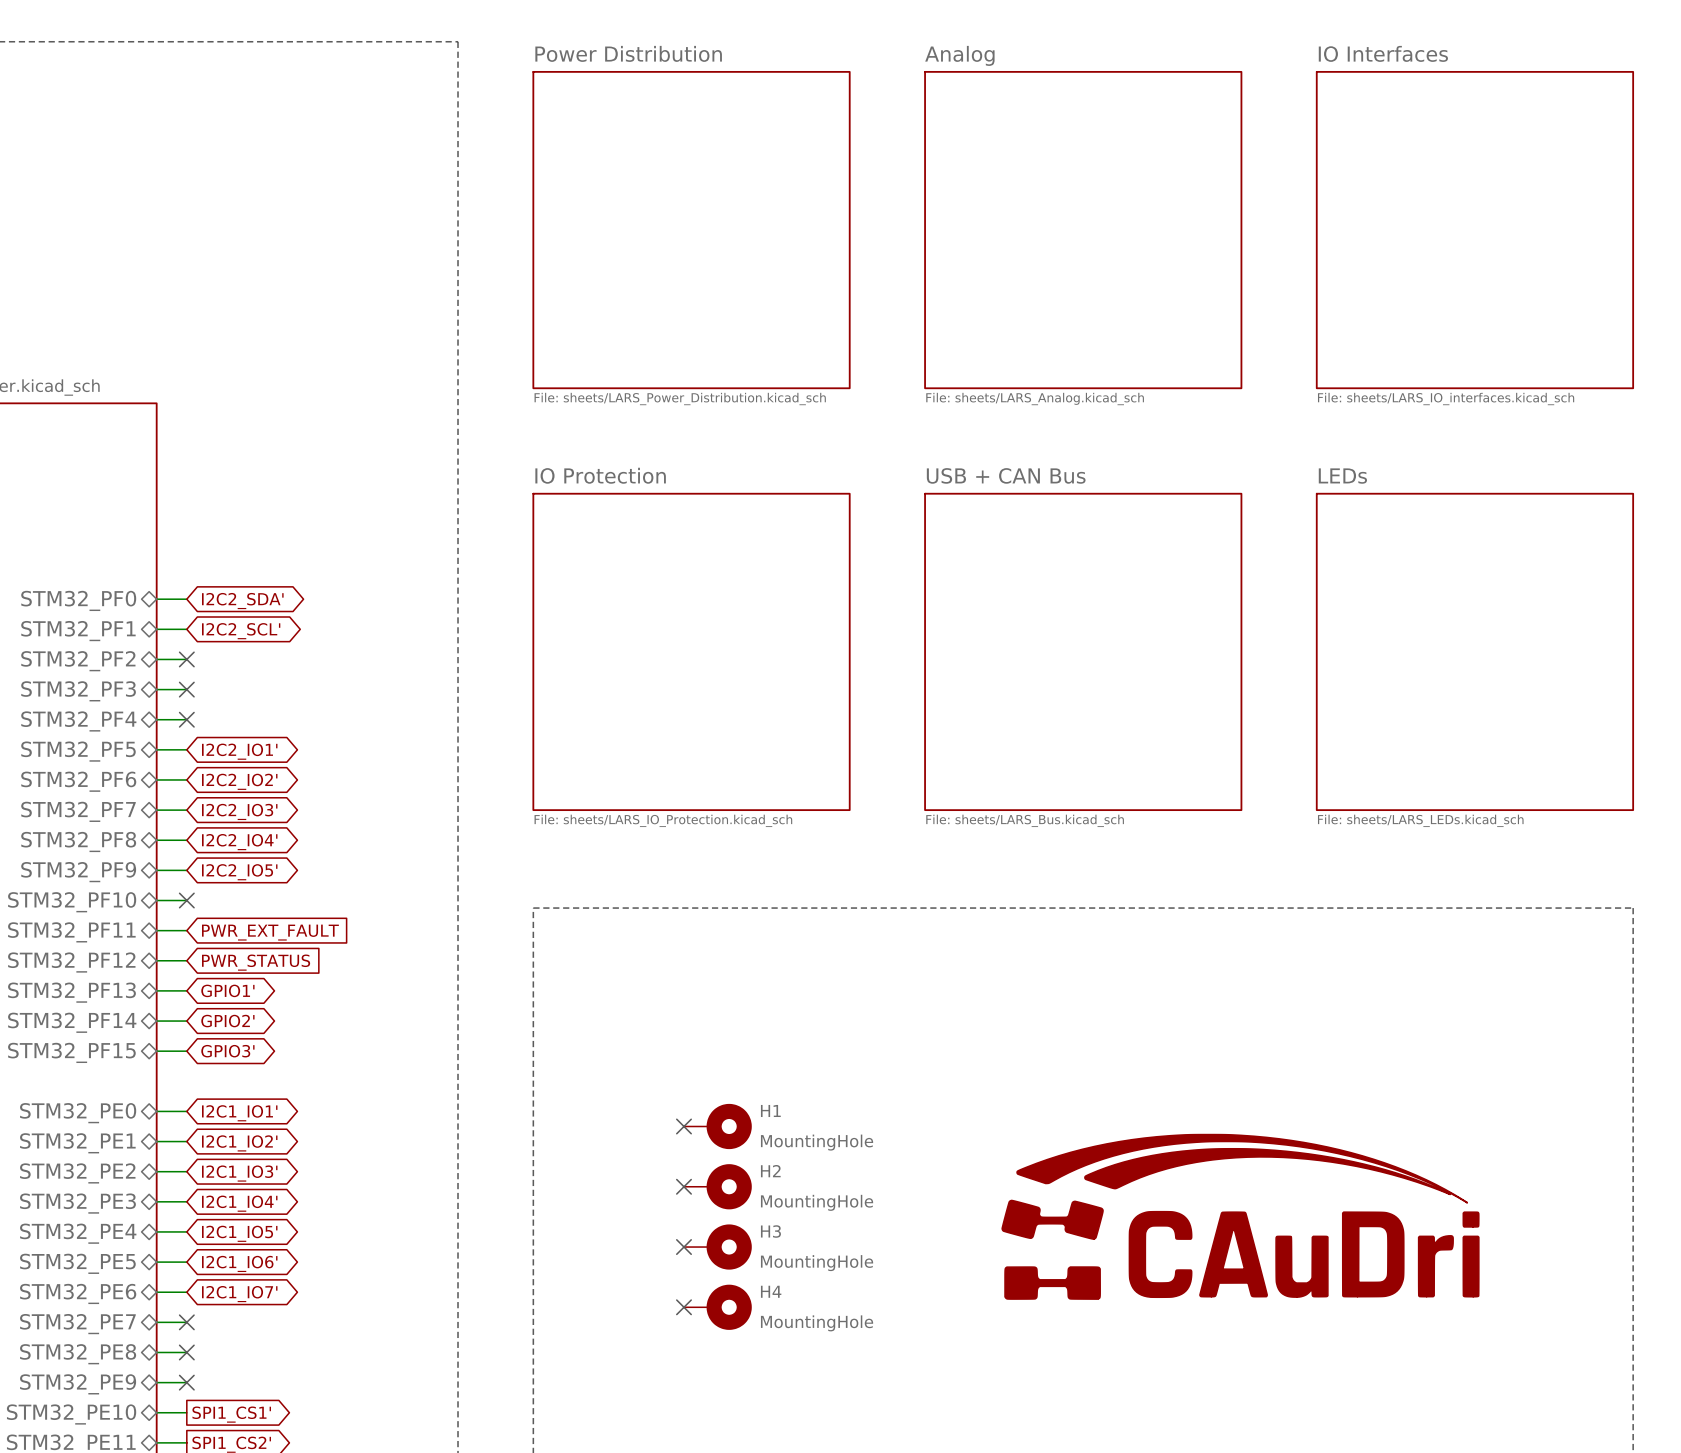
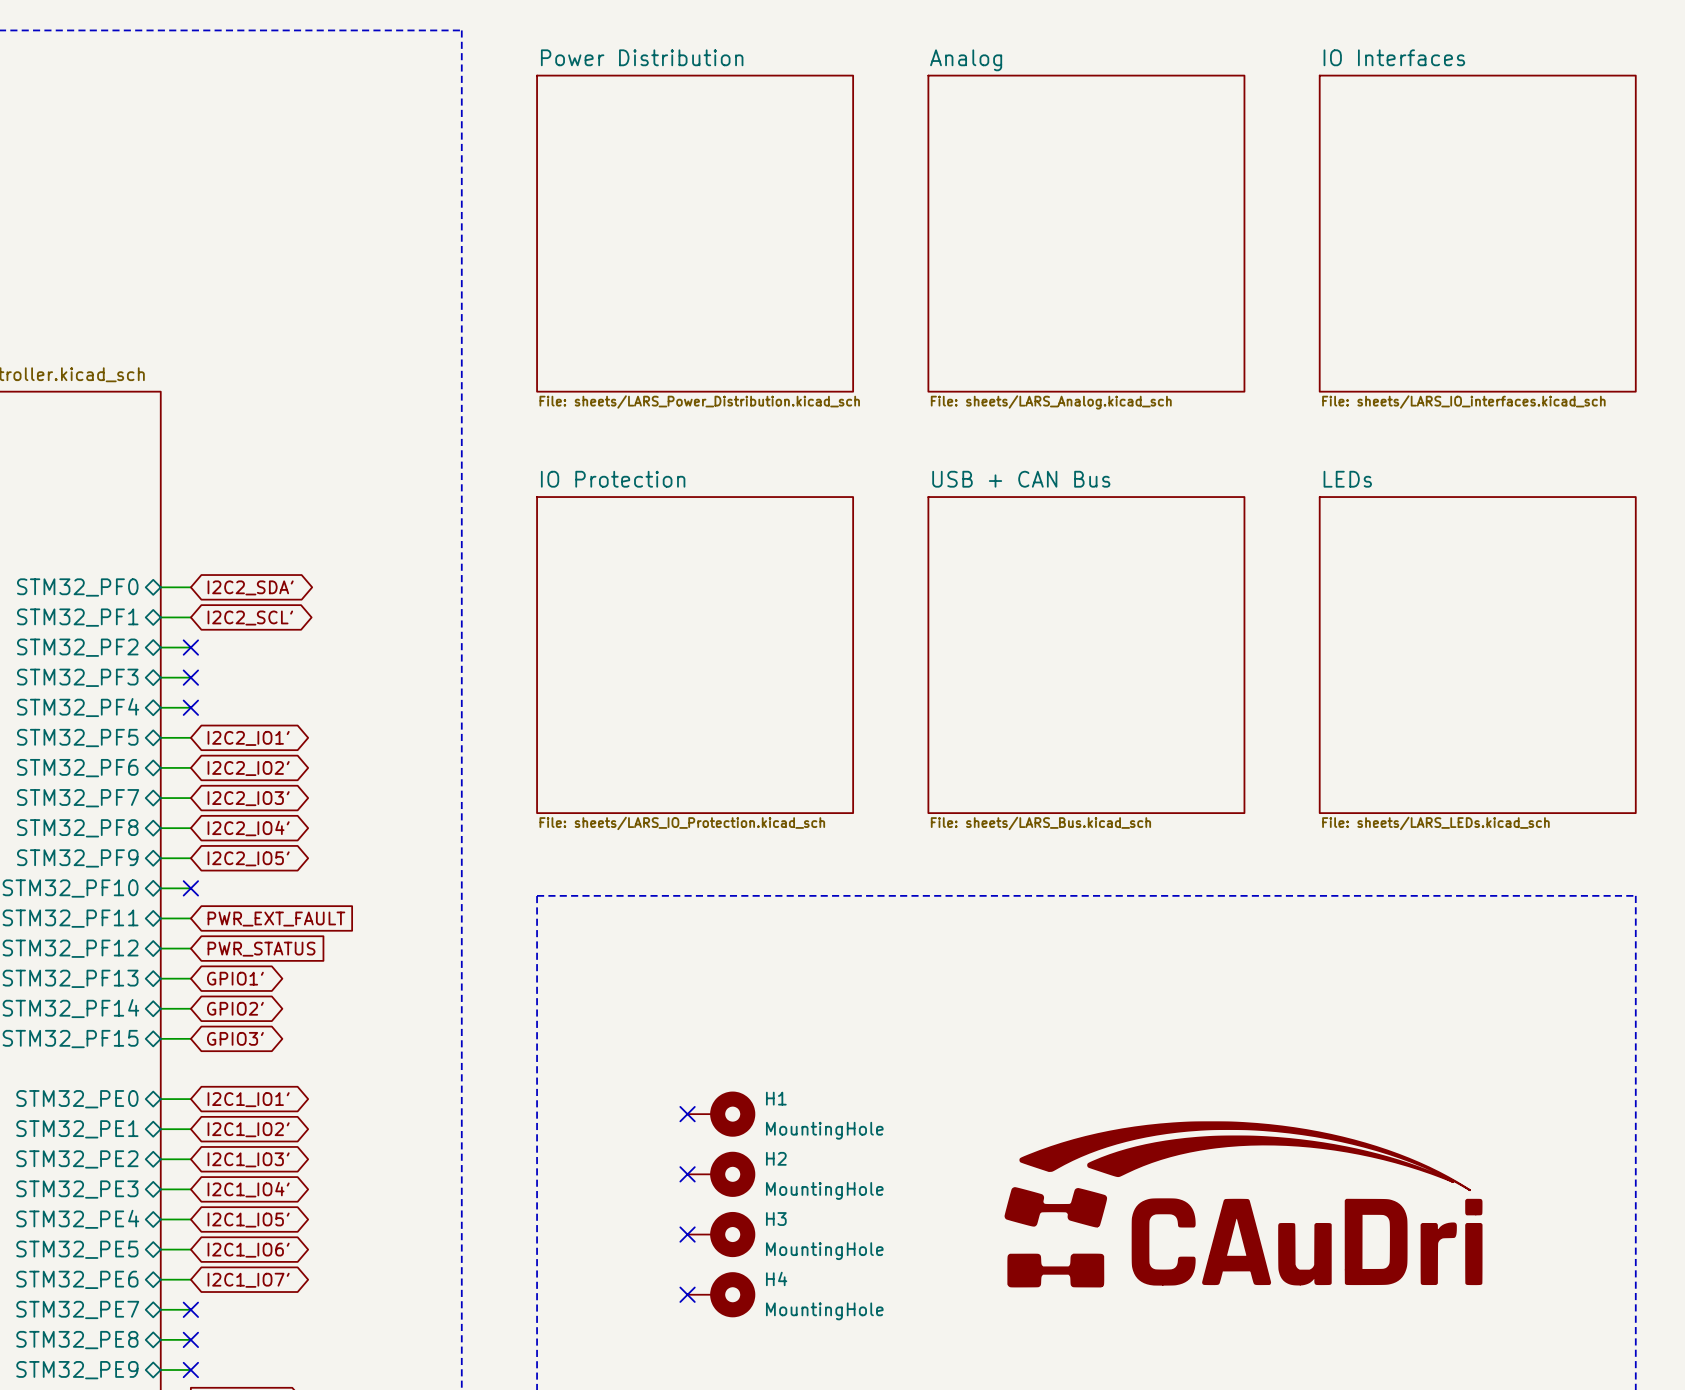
sheet Power Distribution position: (691, 230) -> (695, 233)
sheet Analog position: (1083, 230) -> (1086, 233)
sheet IO Interfaces position: (1474, 230) -> (1477, 233)
sheet IO Protection position: (691, 651) -> (695, 655)
sheet USB + CAN Bus position: (1083, 651) -> (1086, 655)
sheet LEDs position: (1474, 651) -> (1477, 655)

